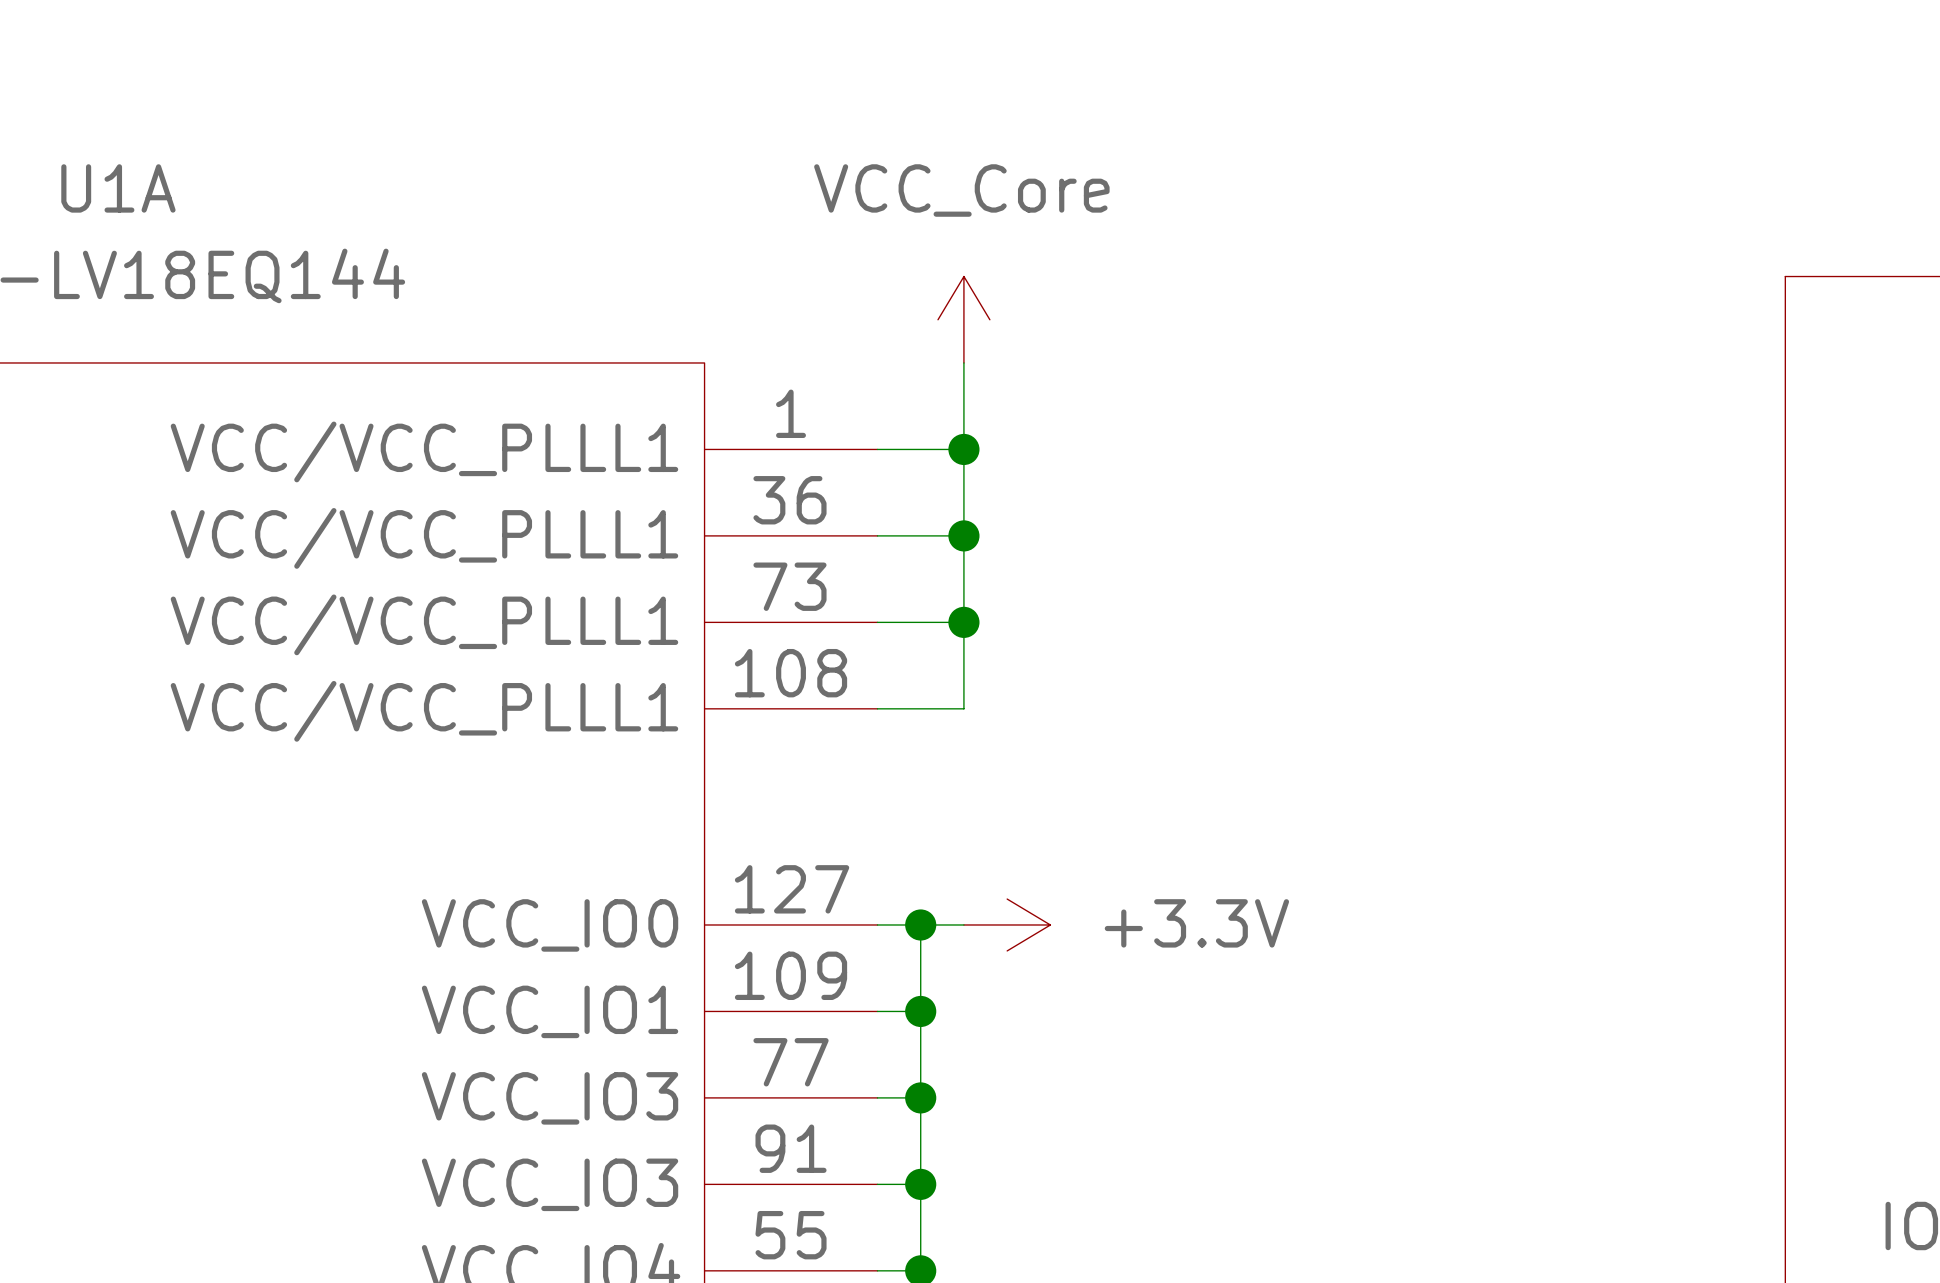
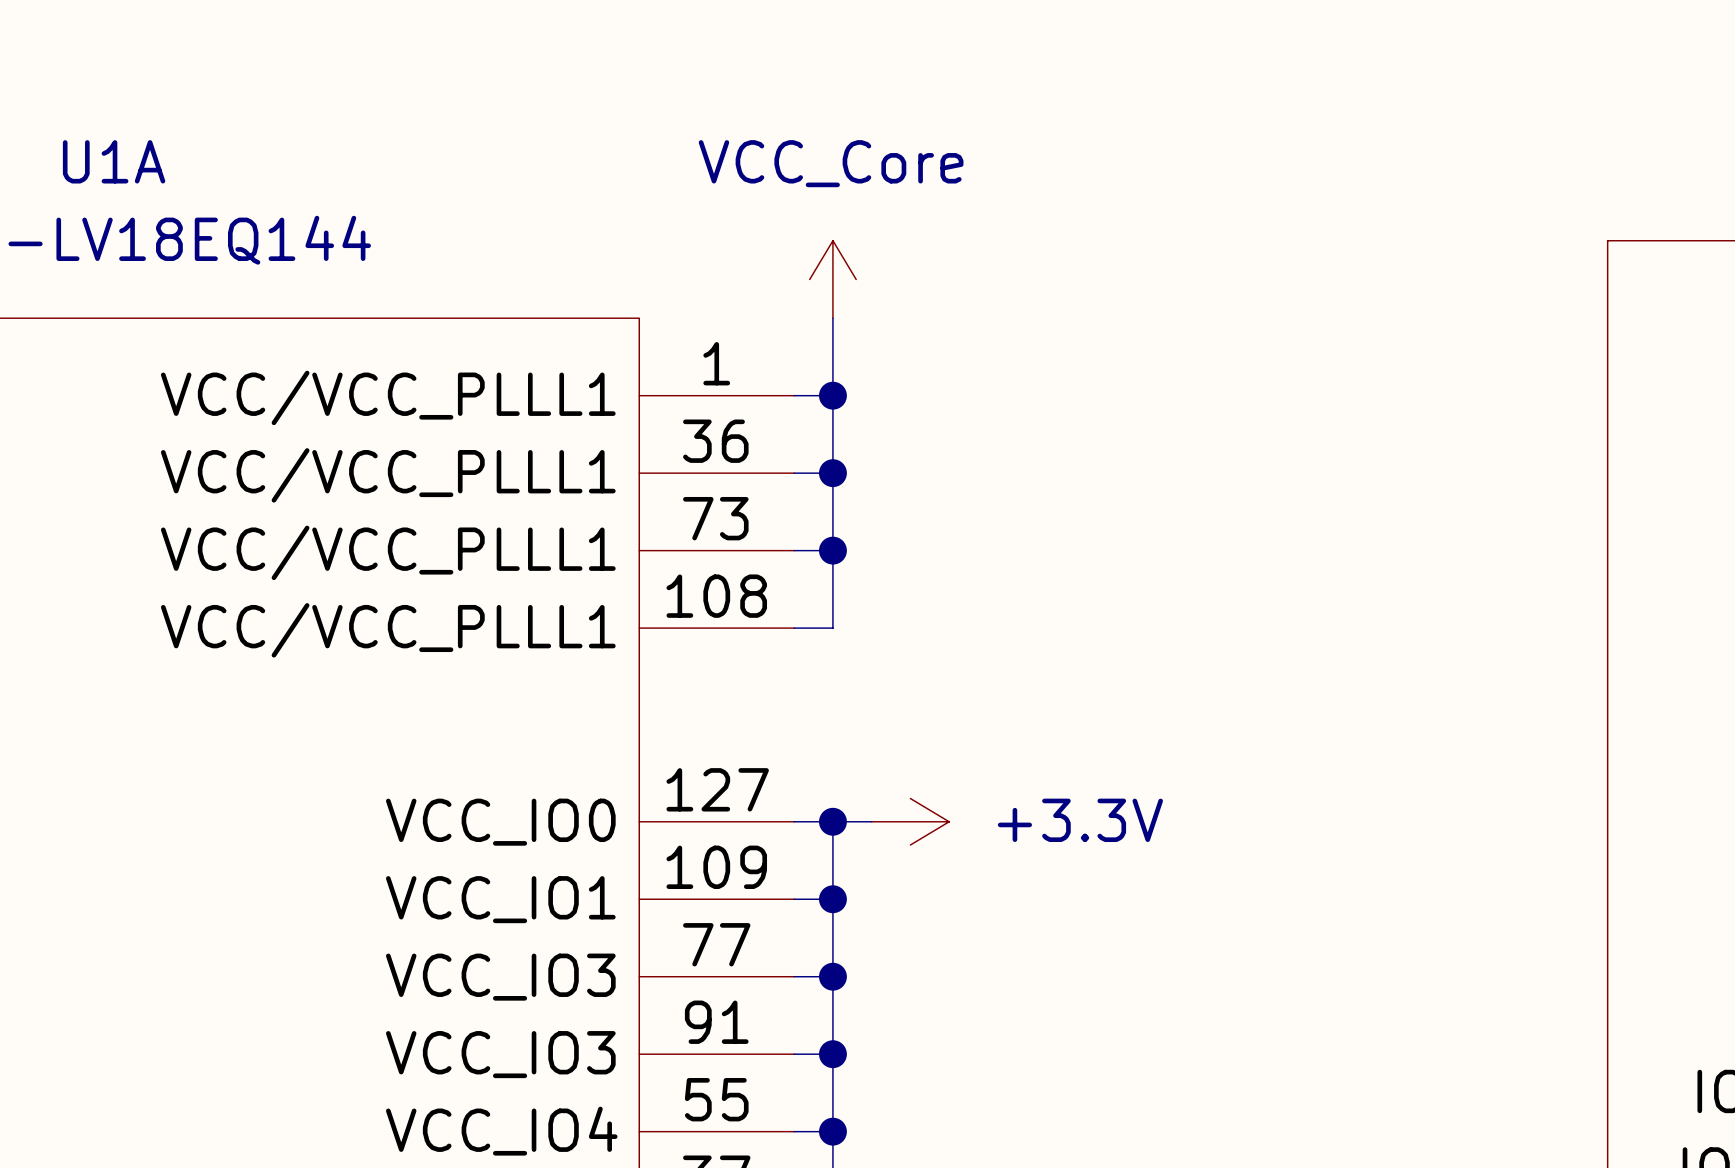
power symbol position: VCC_Core (963, 319) -> VCC_Core (832, 279)
wire: (963, 362) (963, 708) (920, 708) -> (832, 318) (832, 628)
wire: (920, 449) (963, 449) -> none
junction position: (963, 449) -> (832, 395)
wire: (920, 535) (963, 535) -> none
junction position: (963, 535) -> (832, 473)
wire: (920, 622) (963, 622) -> none
junction position: (963, 622) -> (832, 550)

